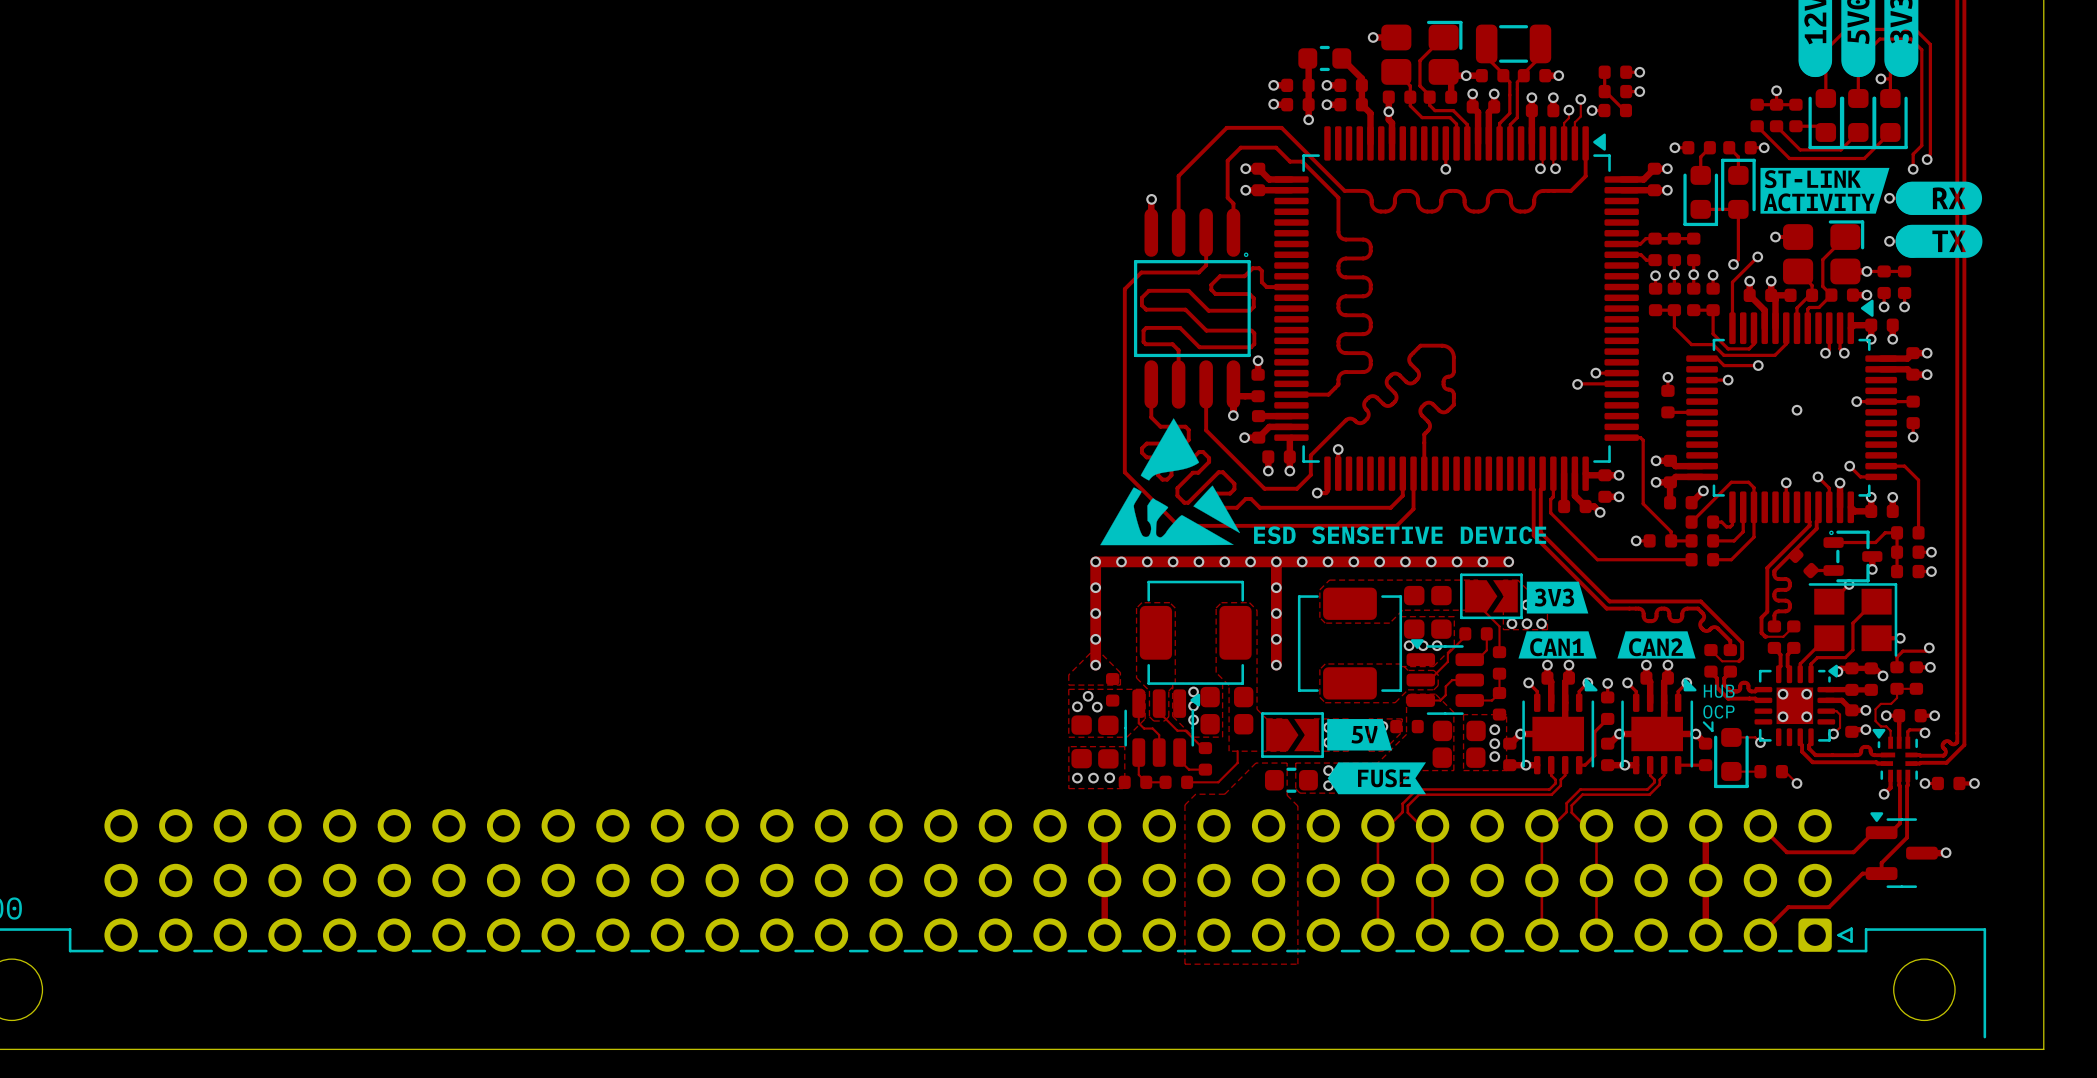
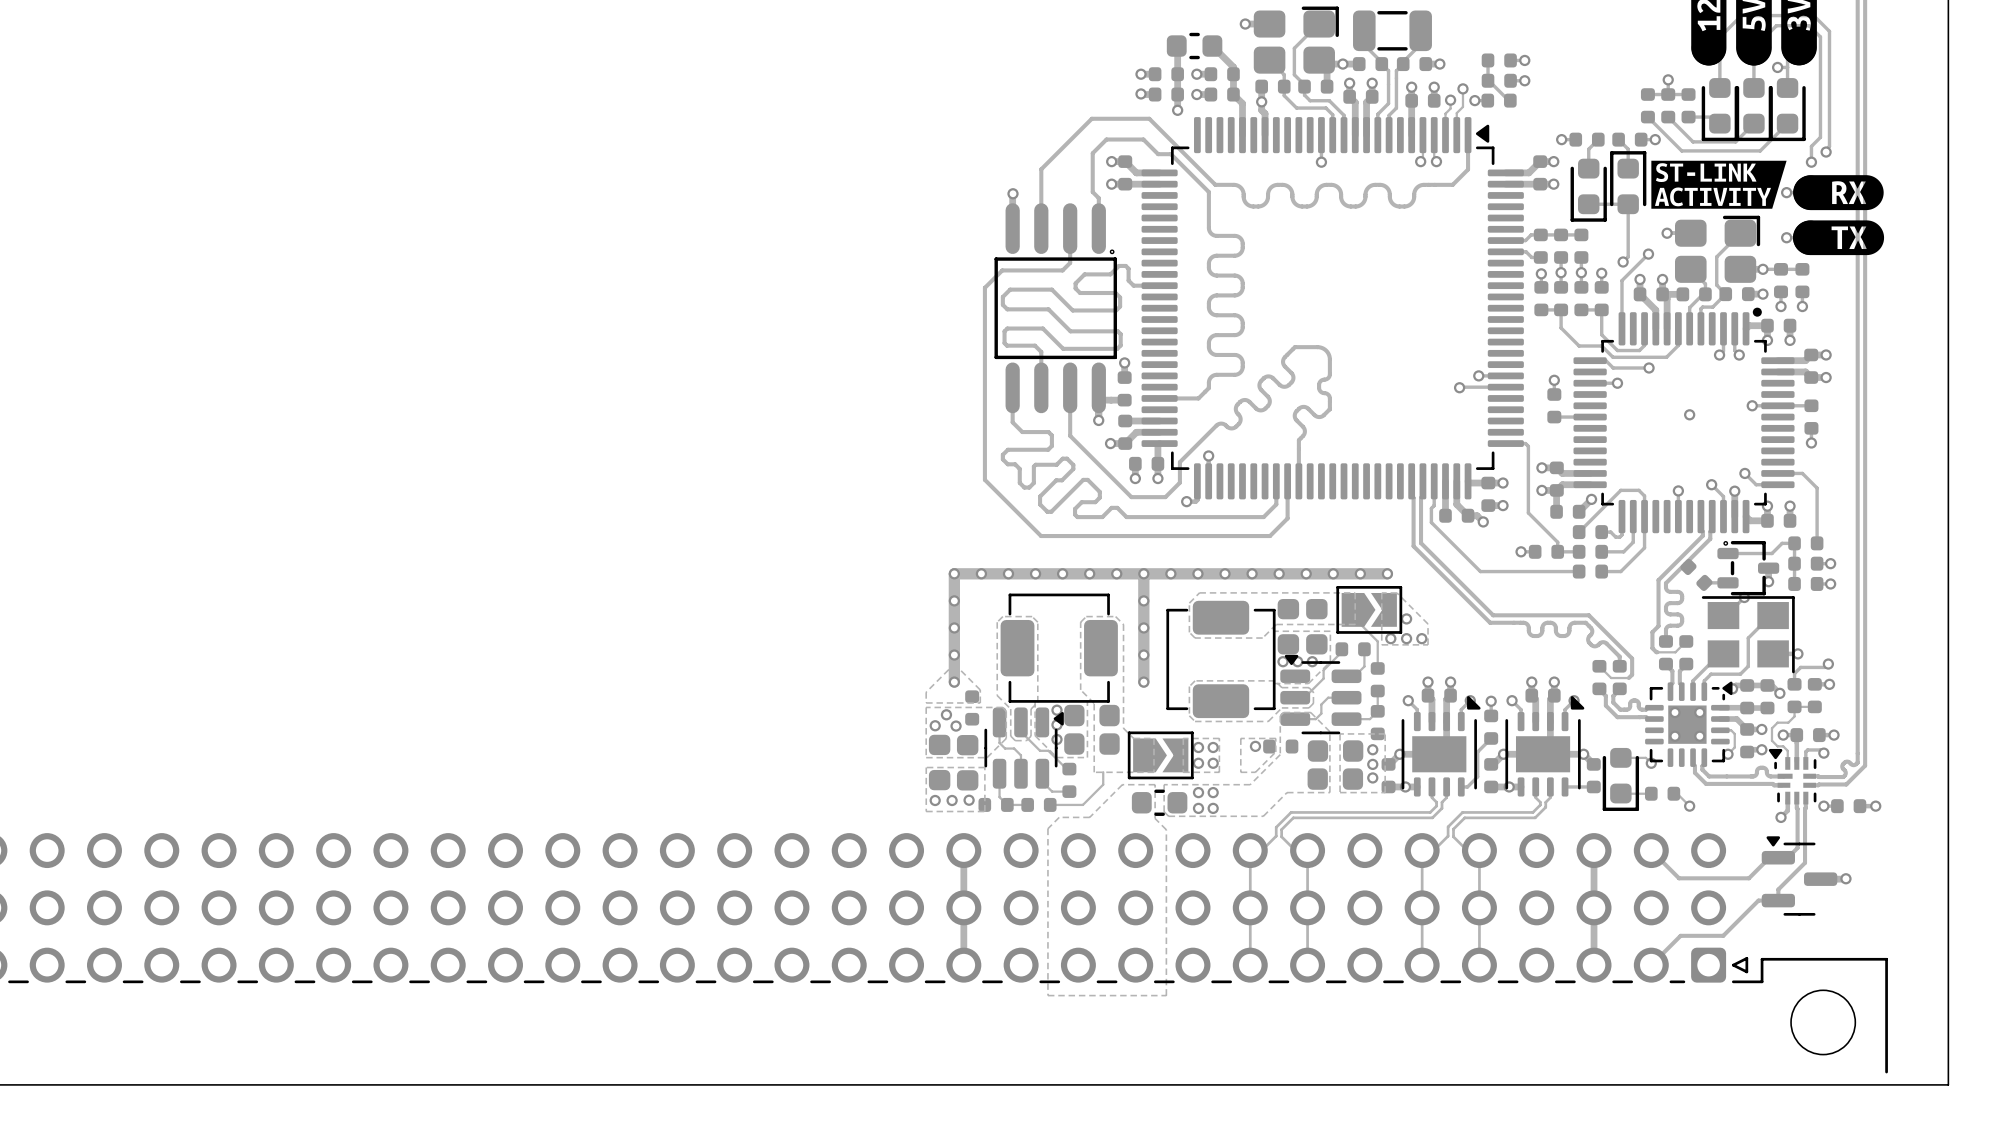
part footprint: [1686, 299, 1898, 524] -> [1573, 307, 1795, 534]
drawing: [1100, 418, 1241, 546] -> none
text: ESD SENSETIVE DEVICE (1400, 535) -> none
drawing: [1518, 581, 1696, 659] -> none
text: HUB (1719, 691) -> none
text: OCP (1718, 711) -> none
drawing: [1327, 719, 1427, 795] -> none
line: (1703, 722) (1712, 730) (1712, 722) -> none

